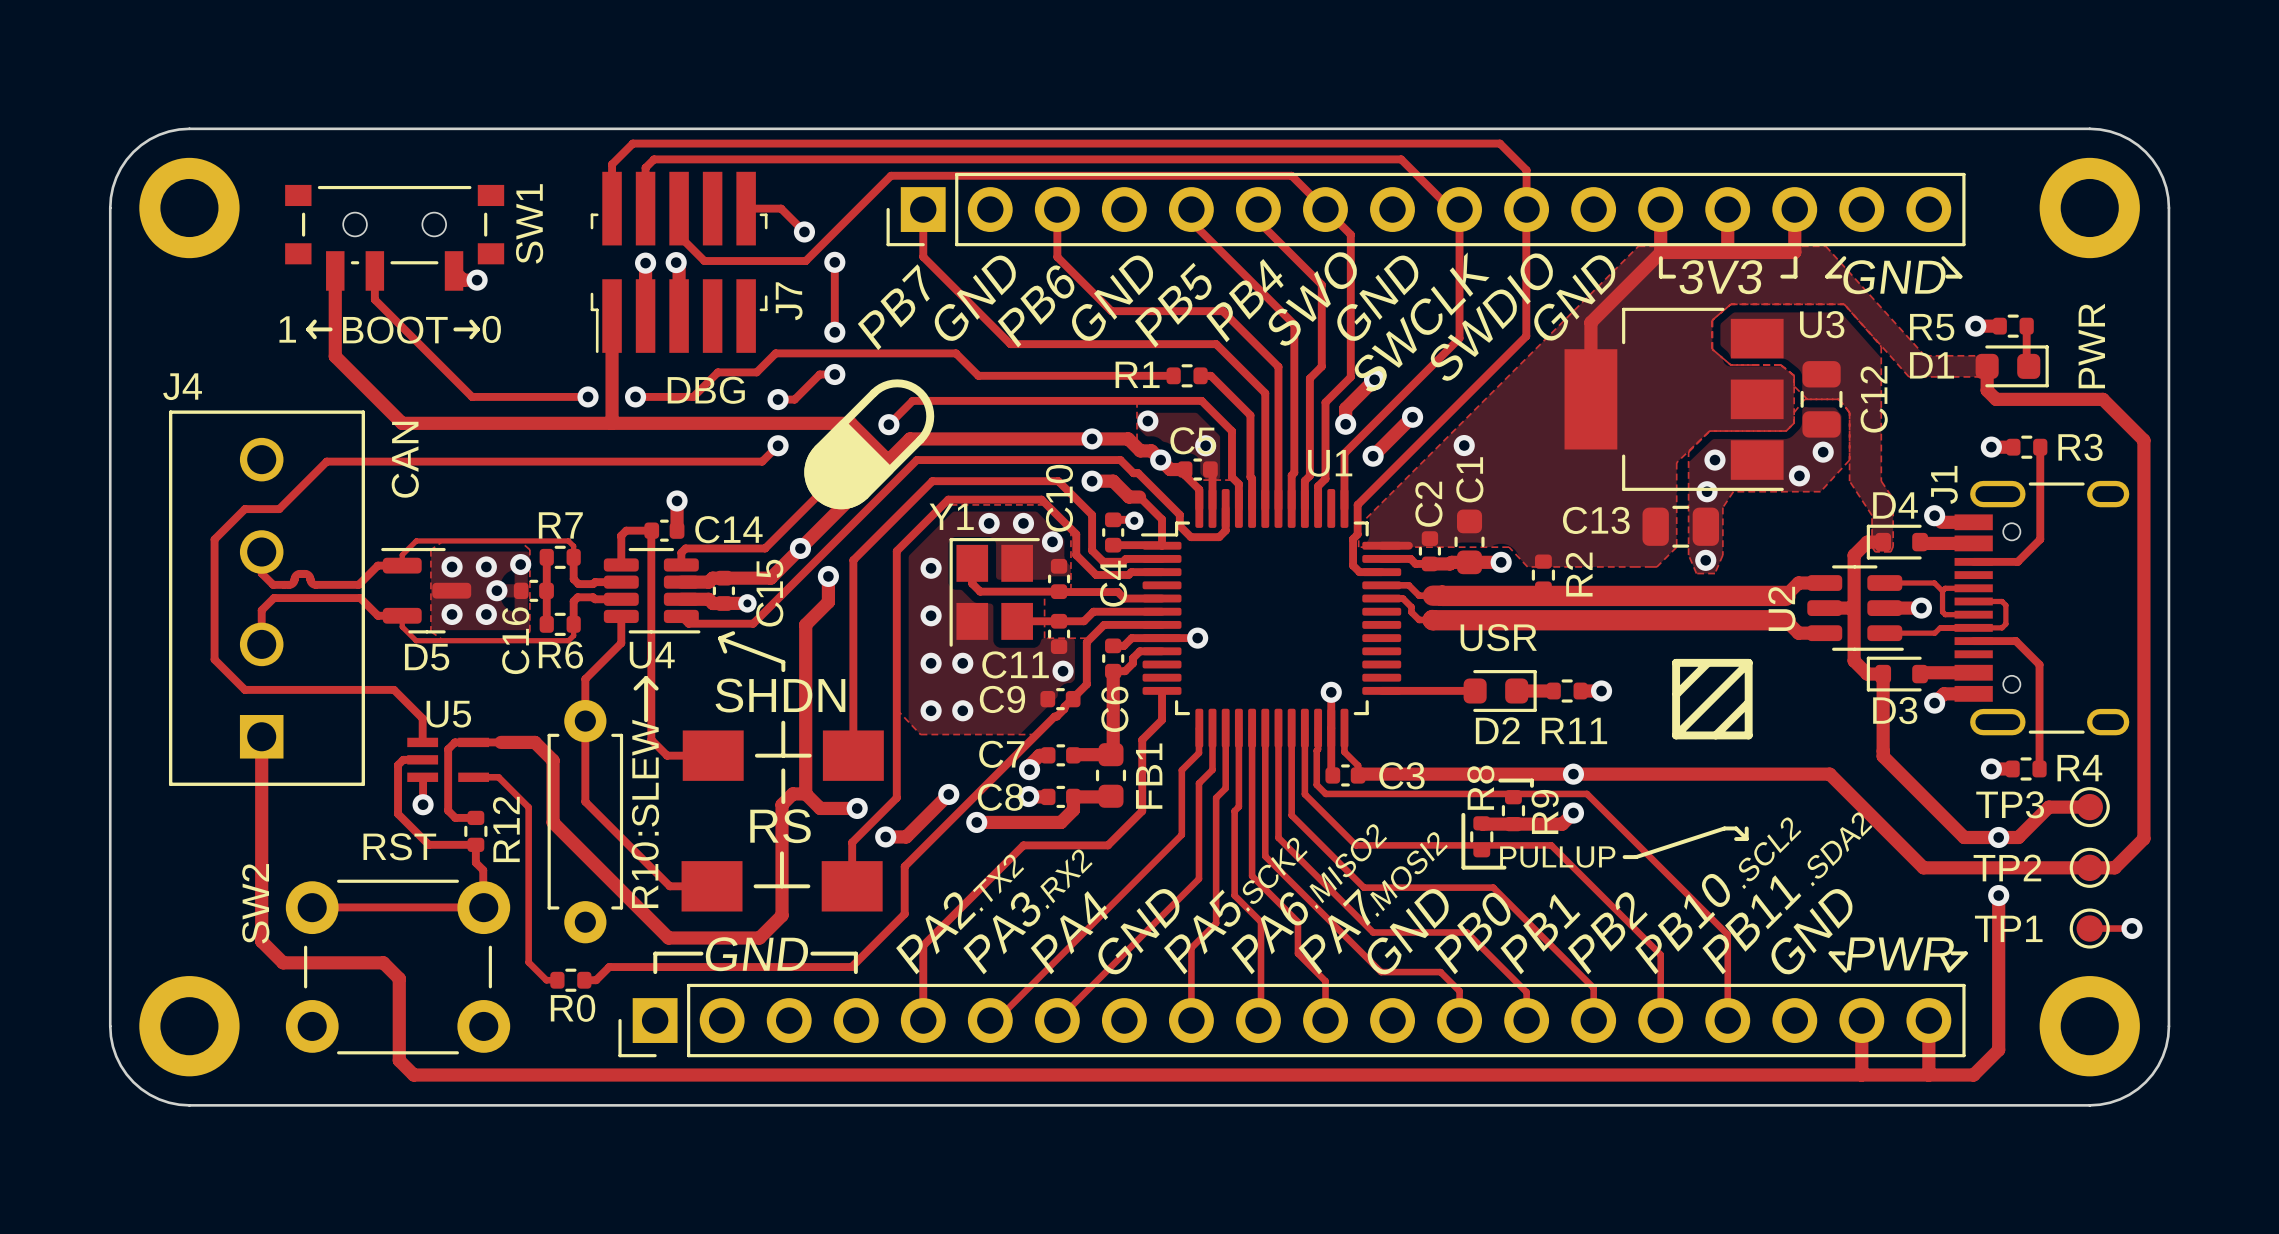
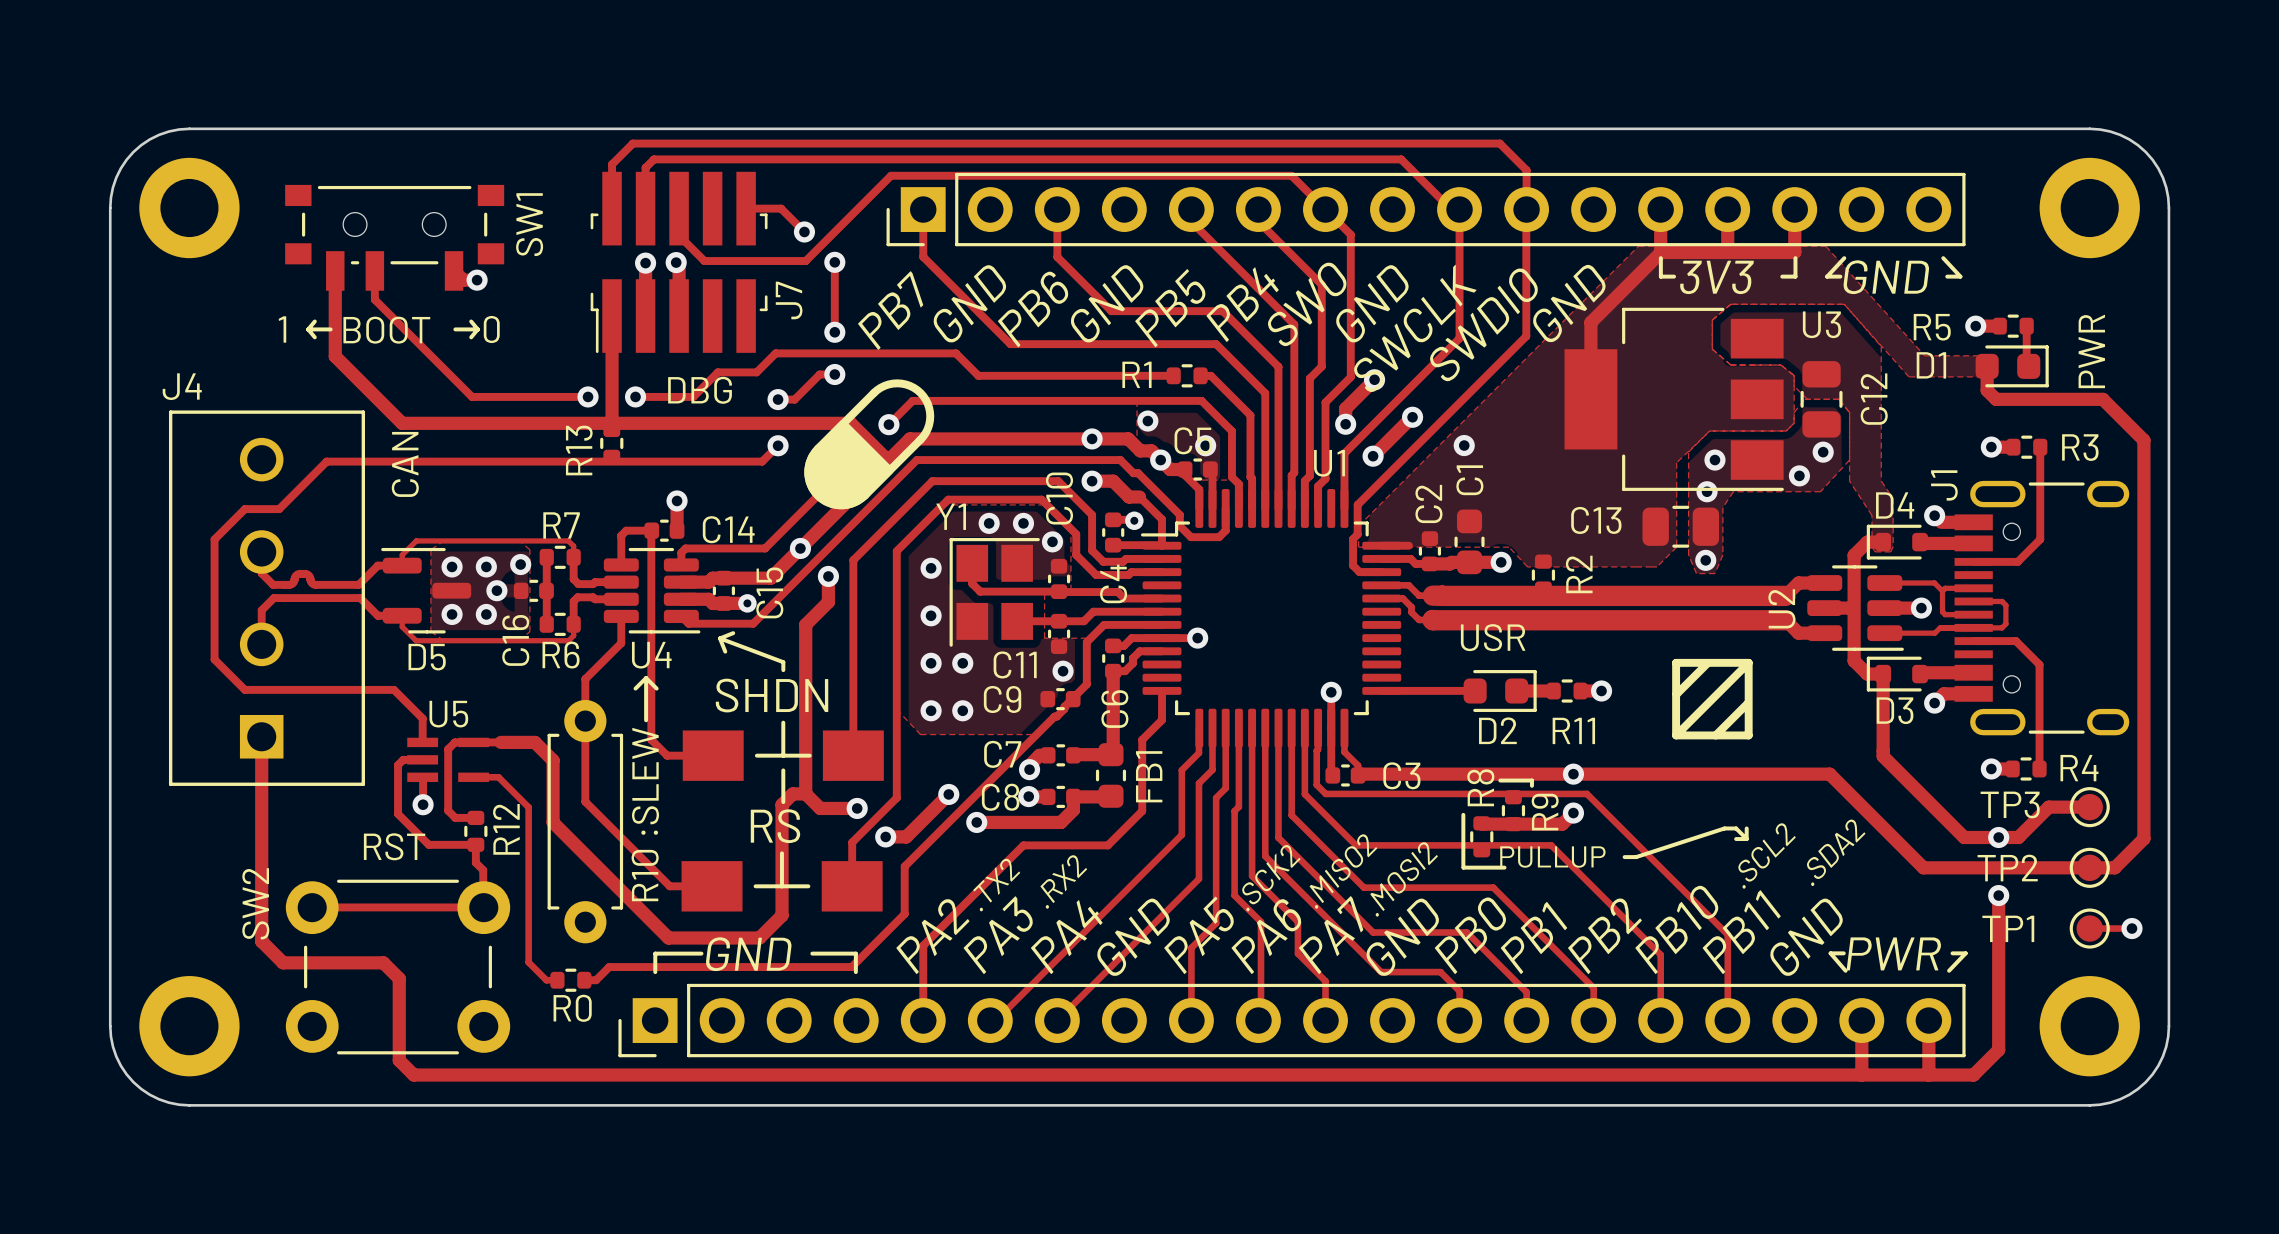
R13: none -> (611, 443)

